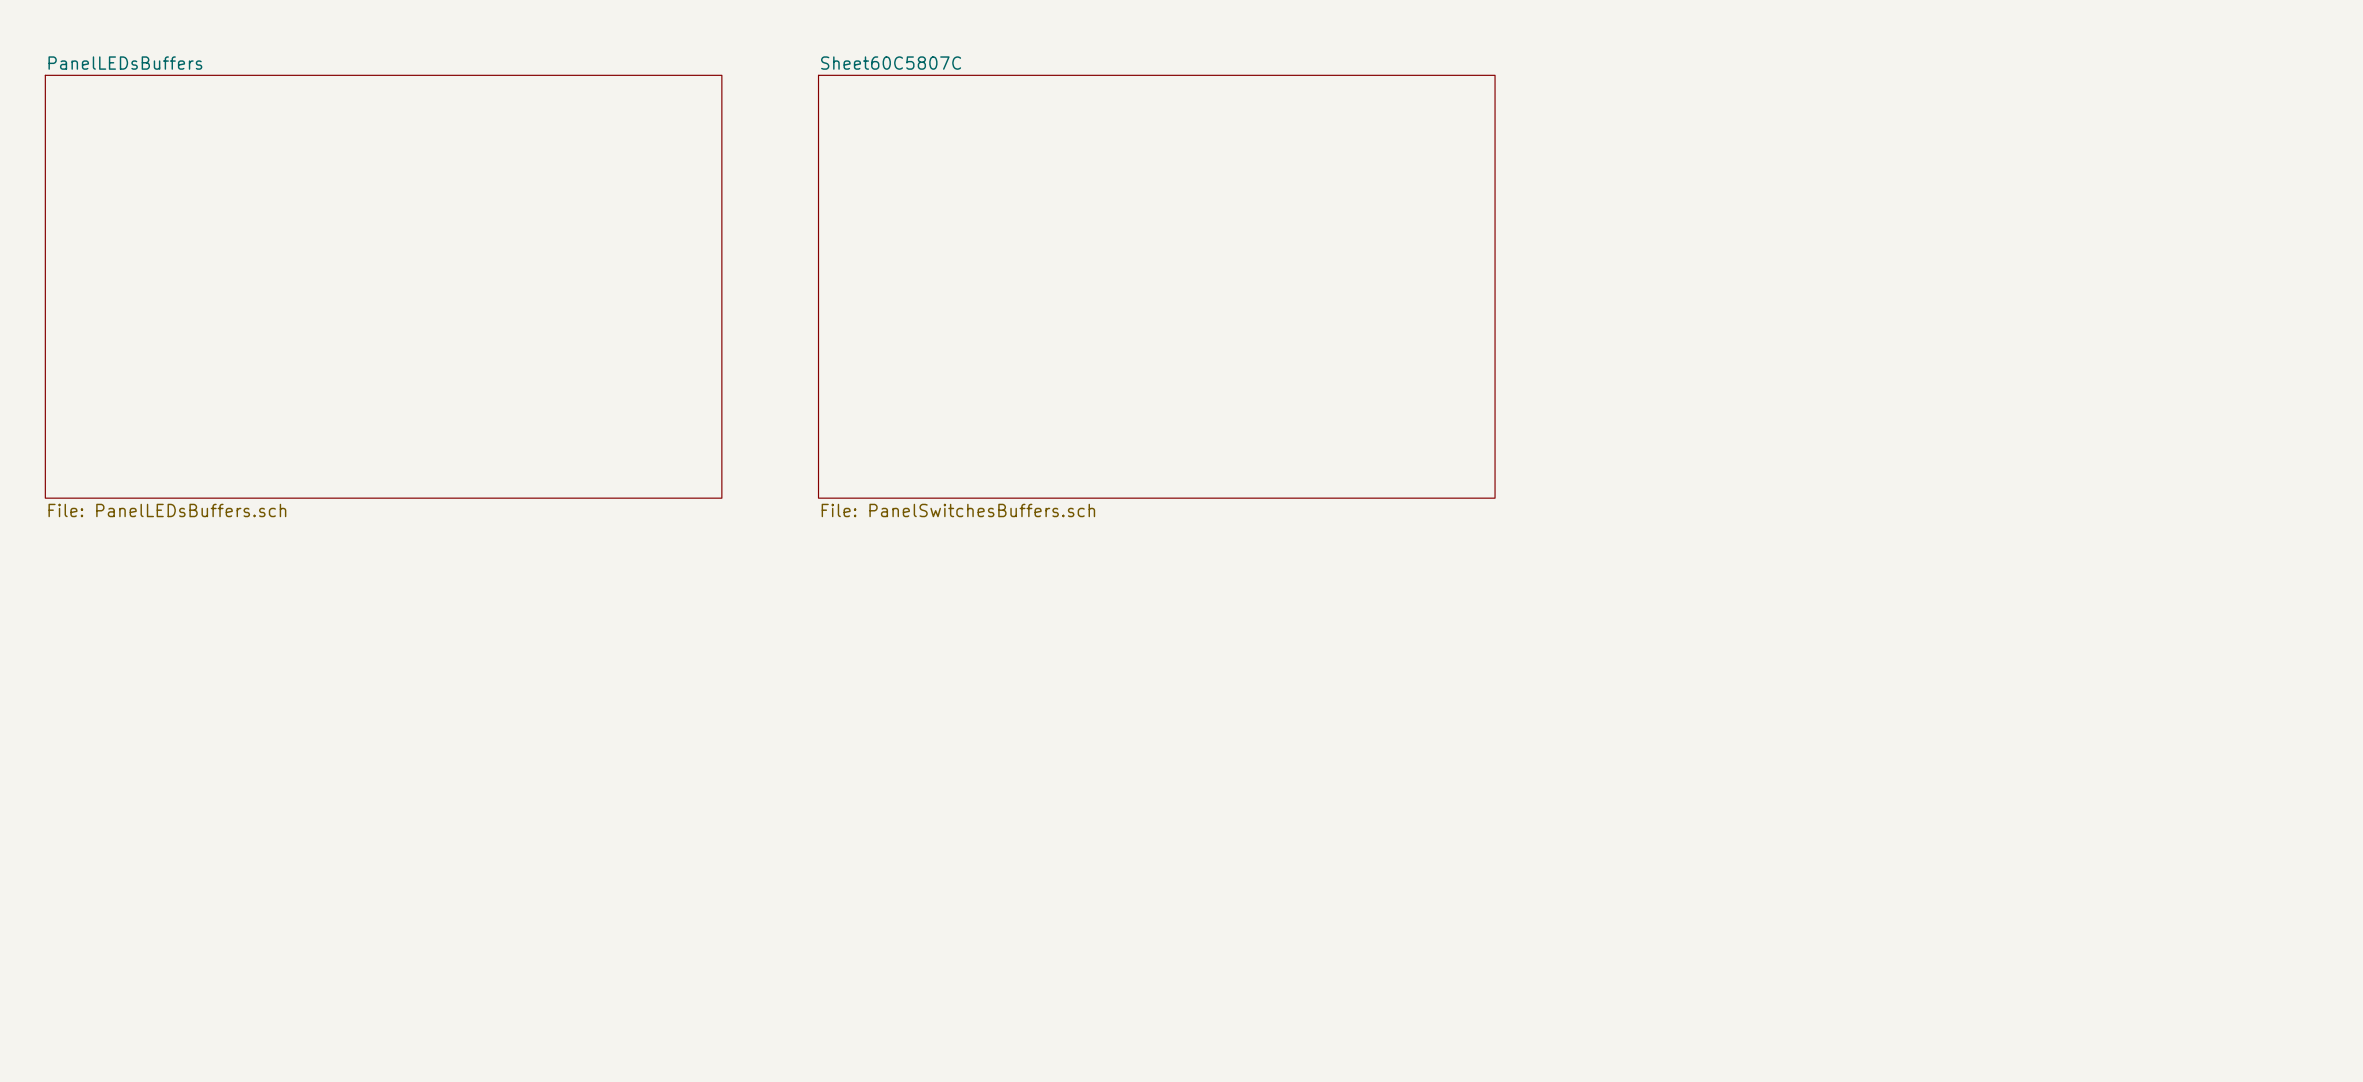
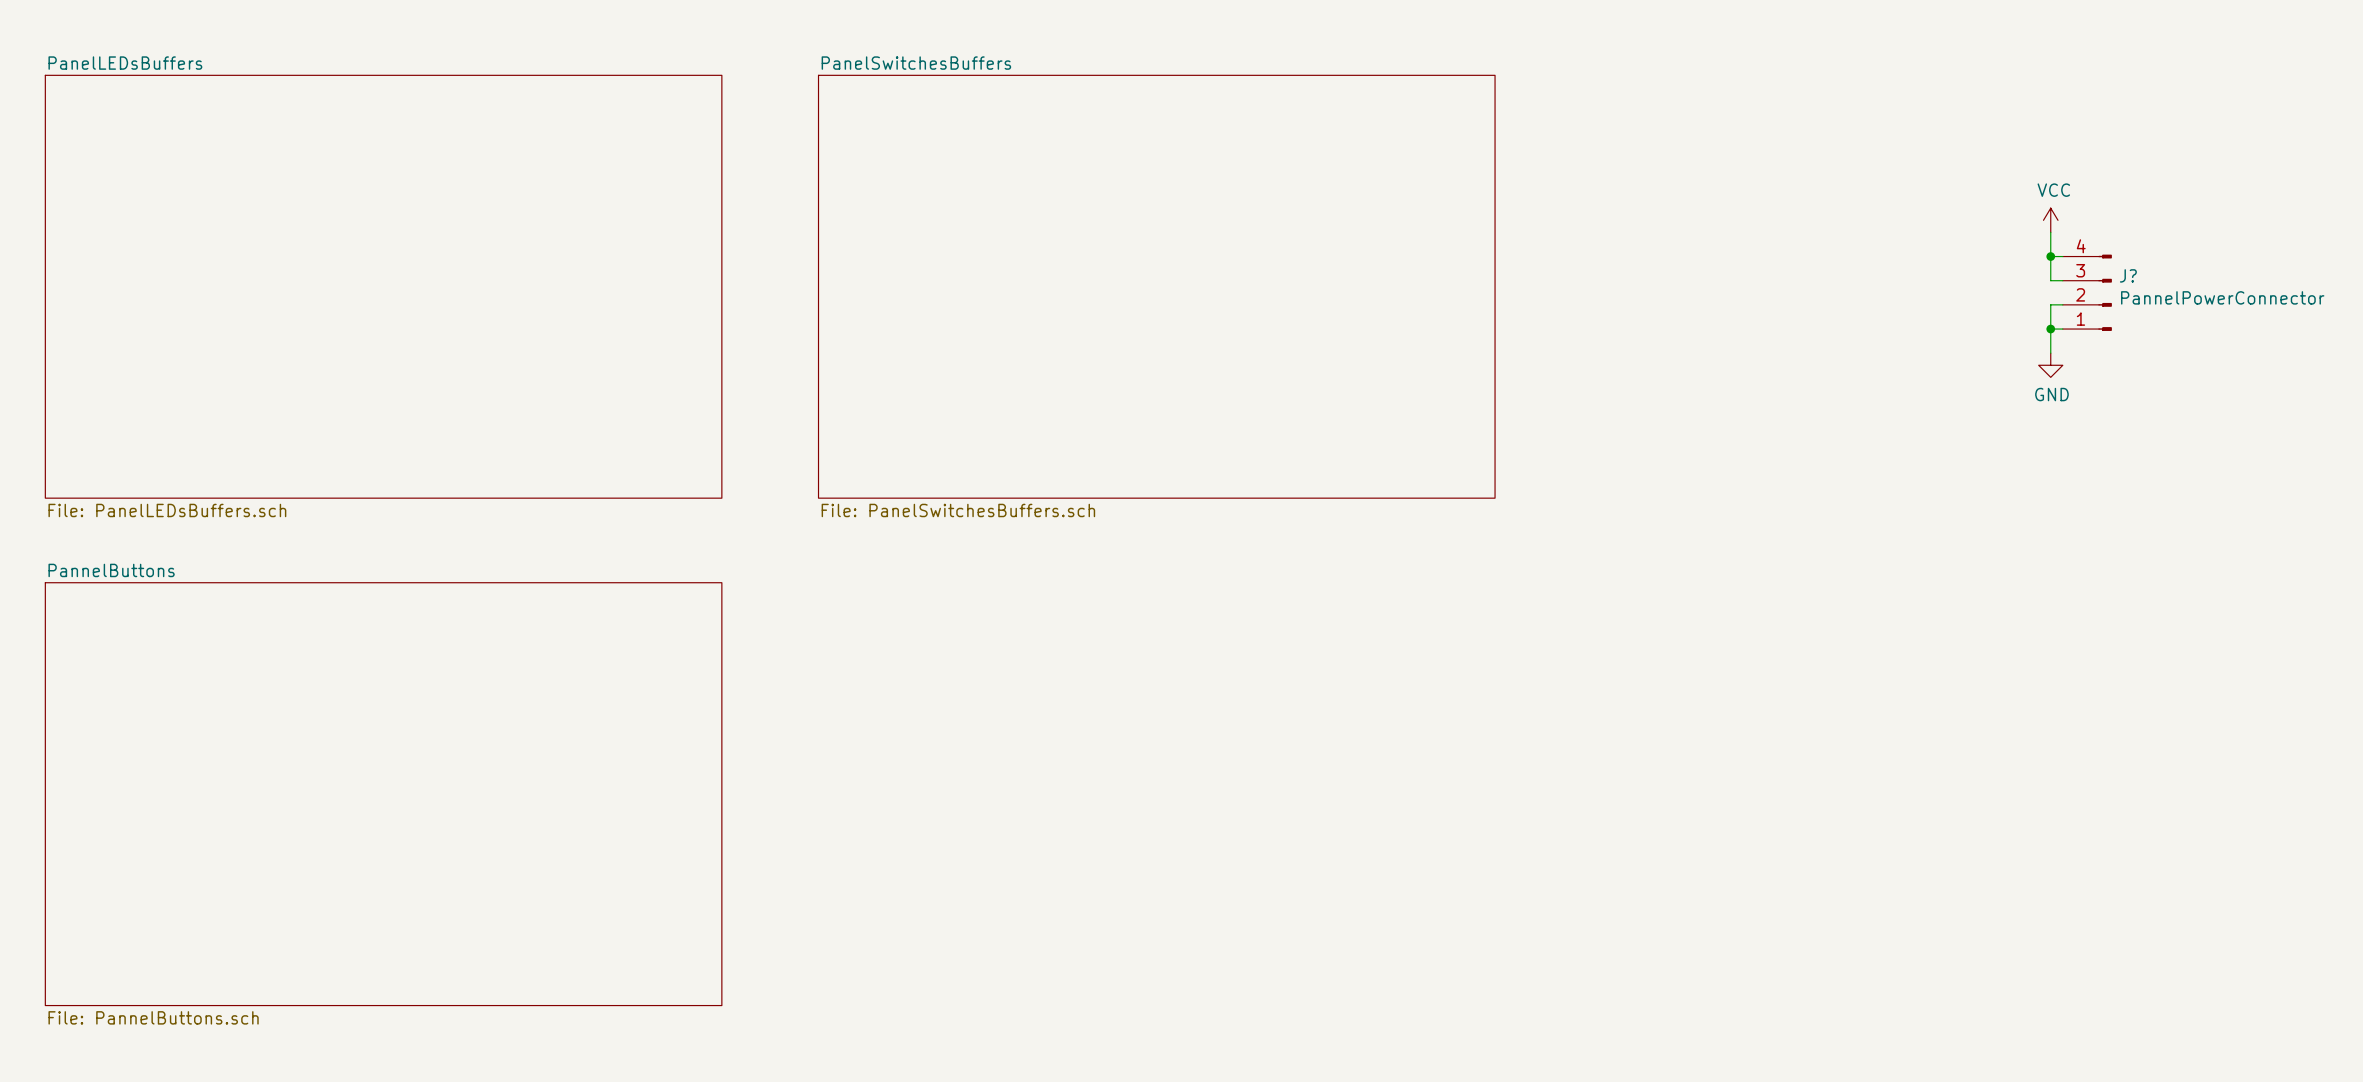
sheet Sheet60C5807C name: Sheet60C5807C (891, 63) -> PanelSwitchesBuffers (916, 63)
power symbol: none -> VCC (2050, 220)
wire: none -> (2050, 232) (2050, 280) (2062, 280)
wire: none -> (2050, 256) (2062, 256)
junction: none -> (2050, 256)
J?: none -> PannelPowerConnector (2087, 292)
wire: none -> (2062, 304) (2050, 304) (2050, 353)
wire: none -> (2050, 329) (2062, 329)
junction: none -> (2050, 329)
power symbol: none -> GND (2050, 365)
sheet PannelButtons: none -> File: PannelButtons.sch (383, 794)

